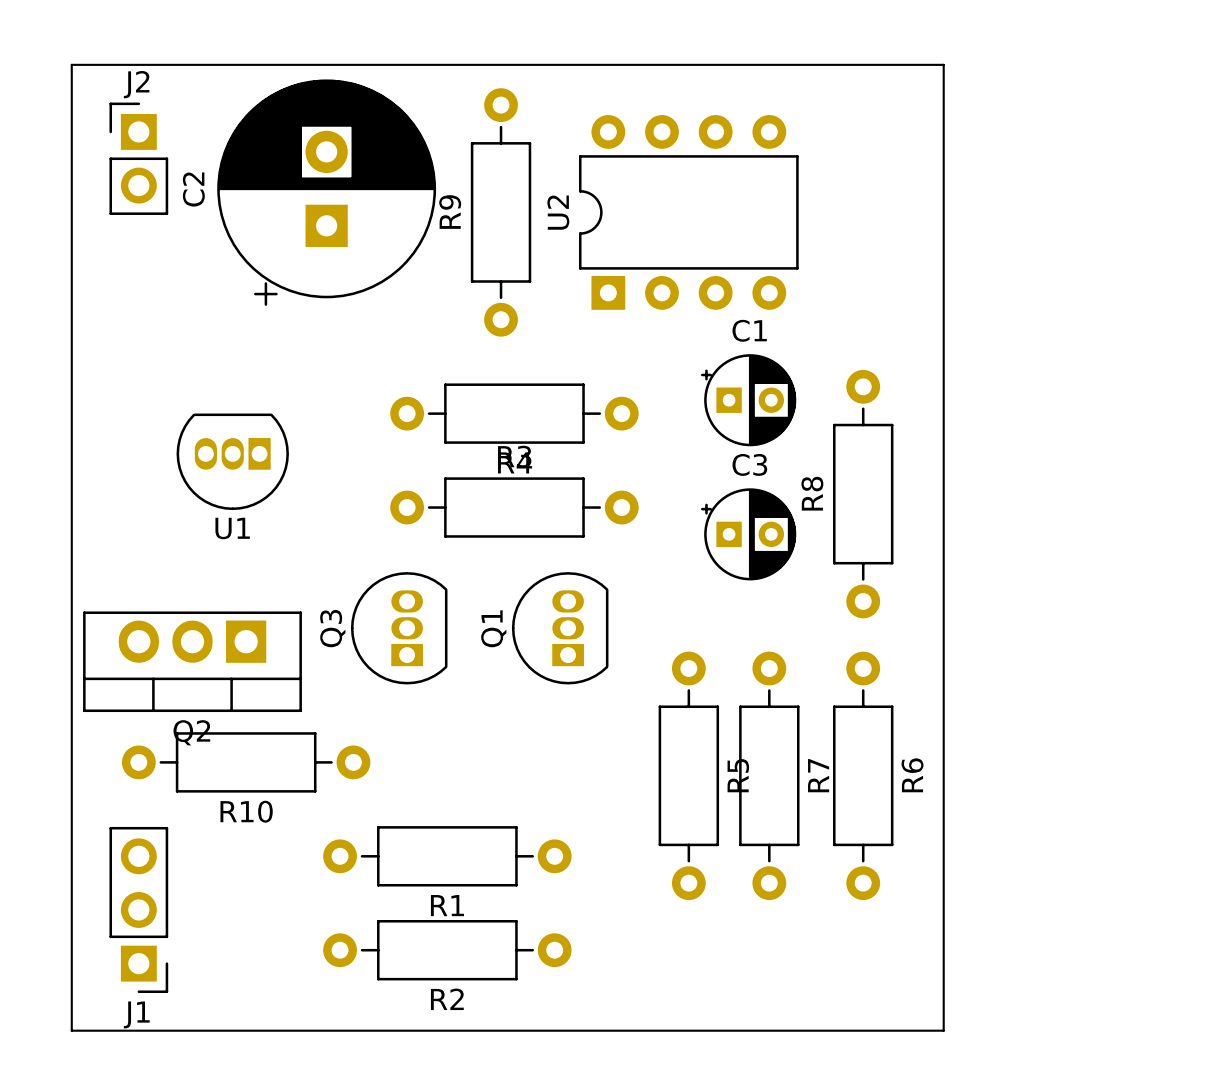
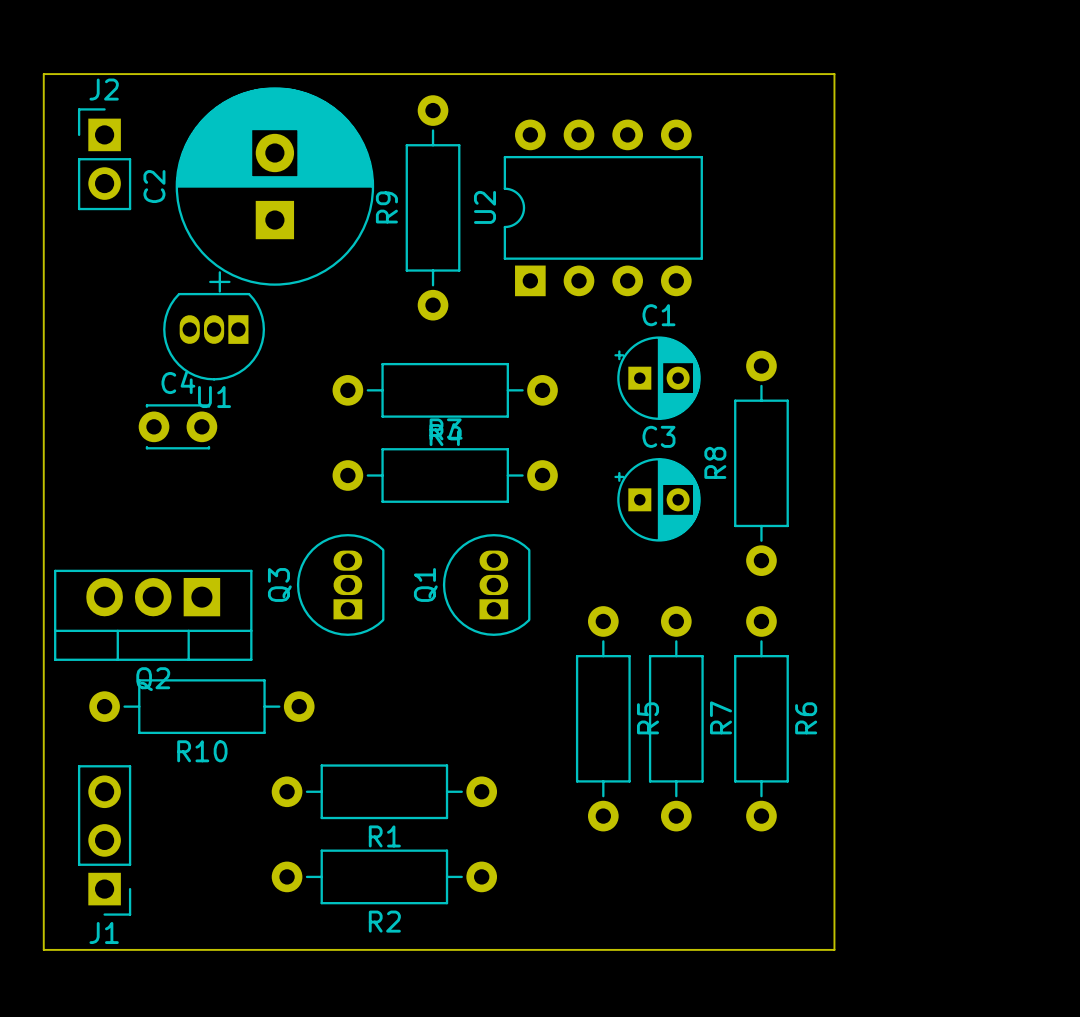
C4: none -> (177, 426)
U1 position: (232, 461) -> (214, 336)

